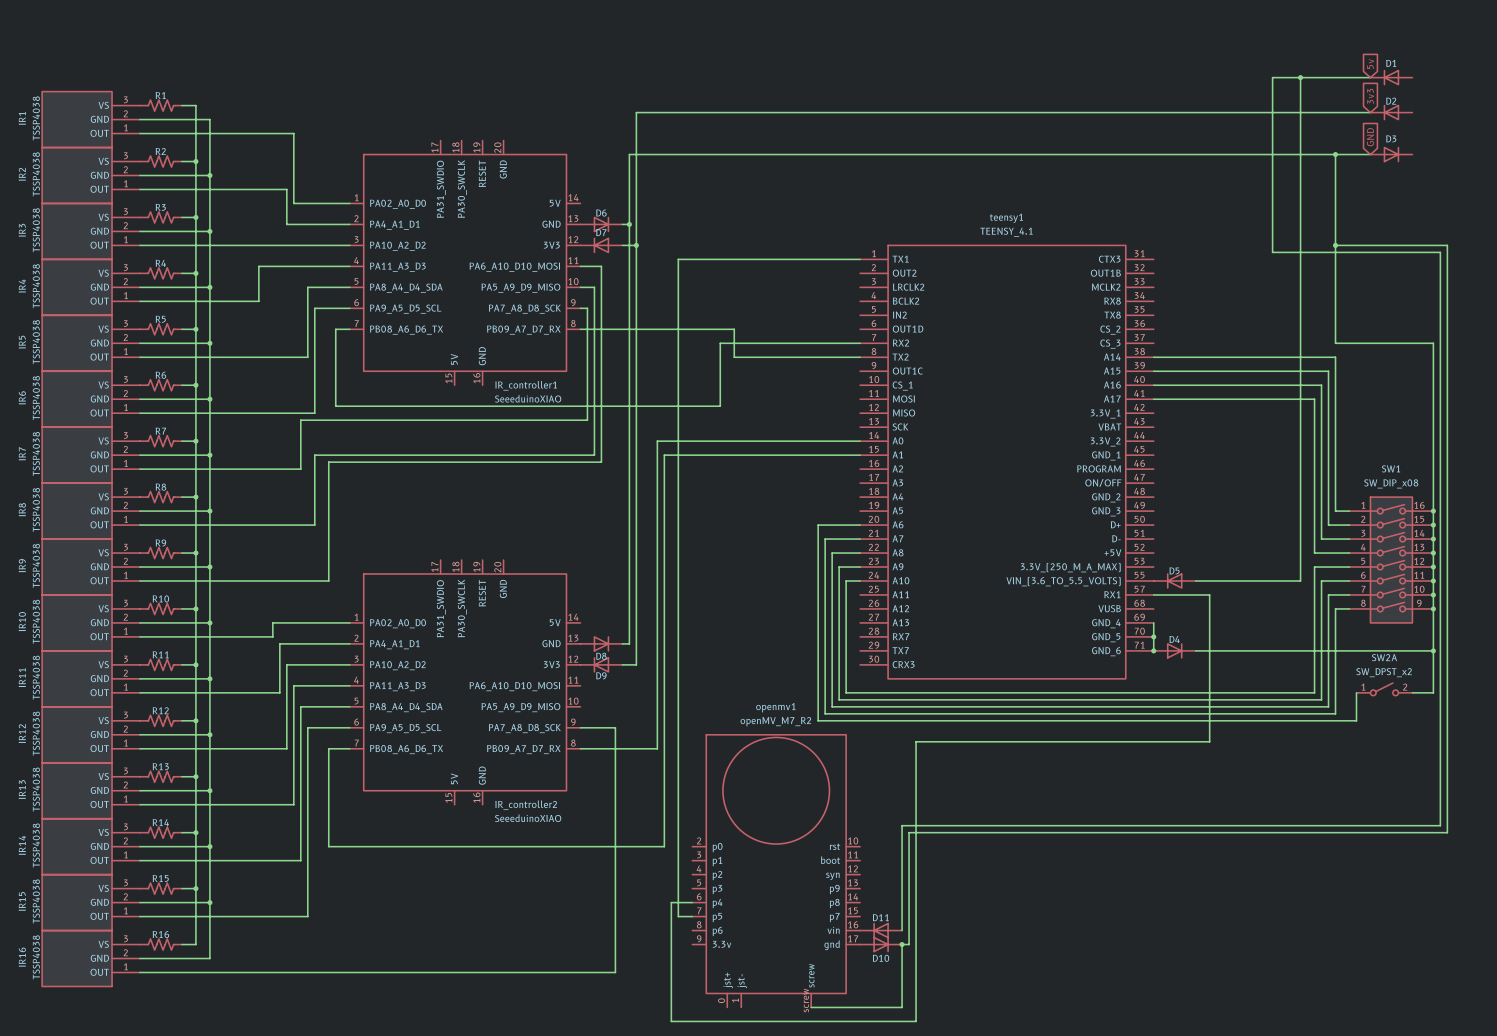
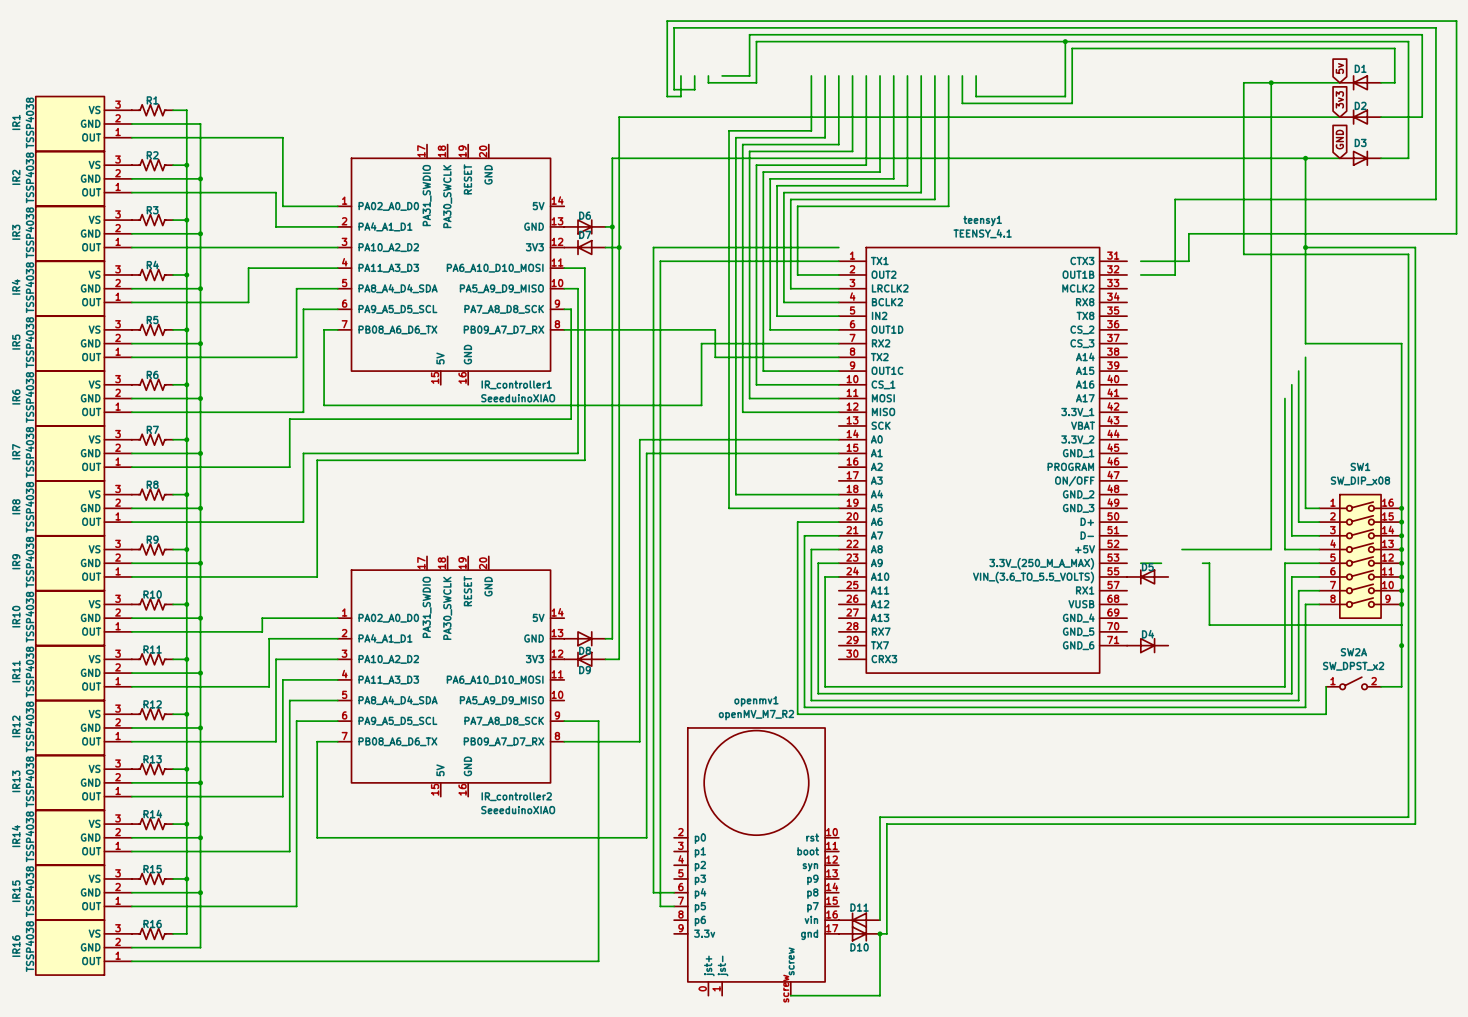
wire: none -> (1065, 41) (1065, 96) (976, 96) (976, 75)
junction: none -> (1065, 41)
wire: none -> (680, 75) (680, 96) (667, 96) (667, 21) (1456, 21) (1456, 233) (1188, 233) (1188, 261) (1140, 261)
wire: none -> (694, 75) (694, 89) (674, 89) (674, 27) (1435, 27) (1435, 199) (1175, 199) (1175, 274) (1140, 274)
wire: none -> (708, 75) (708, 82) (756, 82) (756, 41) (1408, 41) (1408, 158) (1381, 158)
wire: none -> (722, 75) (749, 75) (749, 34) (1422, 34) (1422, 117) (1381, 117)
wire: none -> (811, 75) (811, 130) (729, 130) (729, 508) (838, 508)
wire: none -> (825, 75) (825, 137) (735, 137) (735, 494) (838, 494)
wire: none -> (838, 75) (838, 144) (742, 144) (742, 412) (838, 412)
wire: none -> (852, 75) (852, 151) (749, 151) (749, 398) (838, 398)
wire: none -> (866, 75) (866, 165) (756, 165) (756, 384) (838, 384)
wire: none -> (880, 75) (880, 172) (763, 172) (763, 371) (838, 371)
wire: none -> (893, 75) (893, 178) (770, 178) (770, 329) (838, 329)
wire: none -> (907, 75) (907, 185) (777, 185) (777, 316) (838, 316)
wire: none -> (921, 75) (921, 192) (783, 192) (783, 302) (838, 302)
wire: none -> (934, 75) (934, 199) (790, 199) (790, 288) (838, 288)
wire: none -> (948, 75) (948, 206) (797, 206) (797, 274) (838, 274)
wire: none -> (962, 75) (962, 103) (1072, 103) (1072, 48) (1394, 48) (1394, 82) (1381, 82)
wire: (1153, 357) (1335, 357) -> none
wire: (1153, 371) (1328, 371) -> none
wire: (1153, 385) (1321, 385) -> none
wire: (1153, 399) (1314, 399) -> none
wire: (1300, 553) (1300, 580) (1195, 580) -> (1271, 549) (1182, 549)
wire: none -> (1140, 563) (1161, 563)
wire: none -> (1202, 563) (1209, 563) (1209, 625) (1401, 625)
wire: (1153, 594) (1209, 594) (1209, 741) (916, 741) (916, 1021) (671, 1021) (671, 902) -> (838, 247) (653, 247) (653, 892)
wire: (1153, 622) (1153, 650) -> none
junction: (1153, 636) -> none
junction: (1153, 650) -> none
wire: (1195, 650) (1433, 650) -> none

